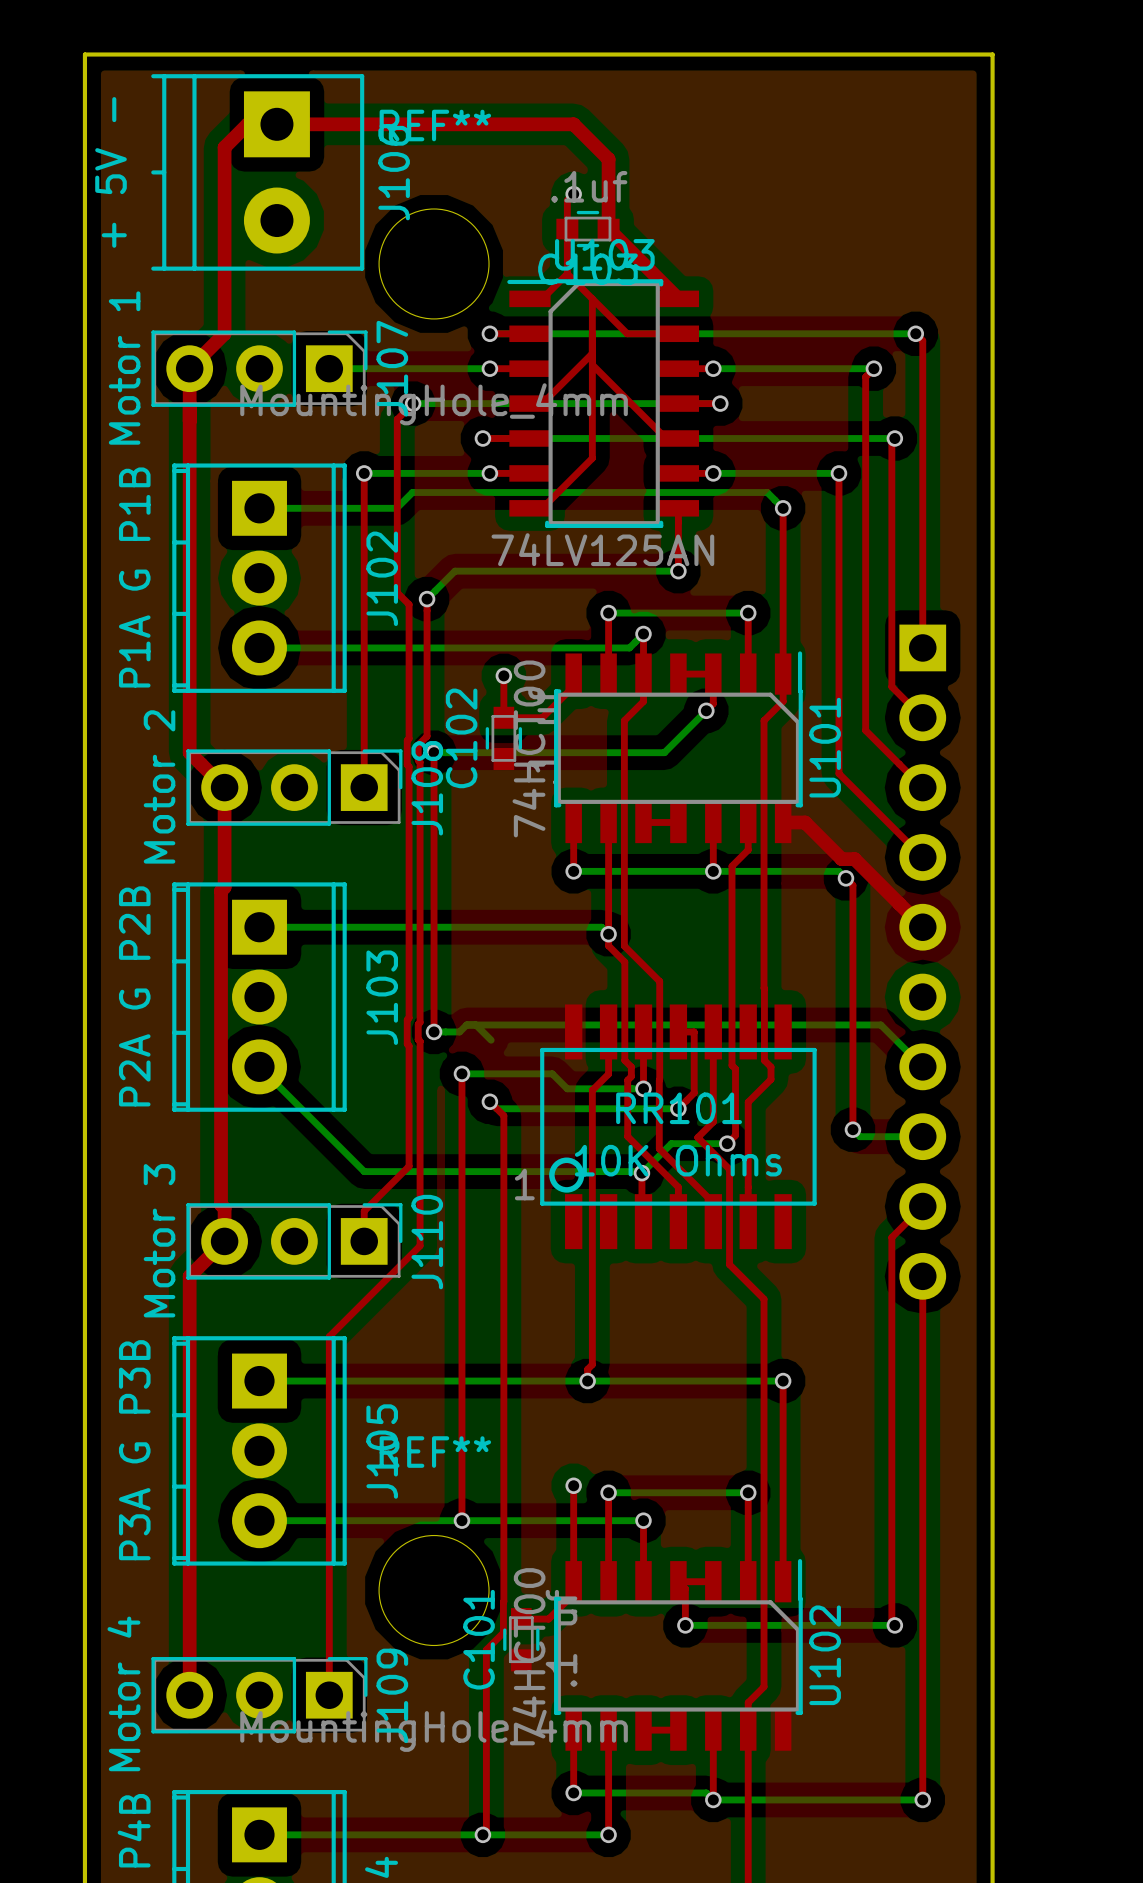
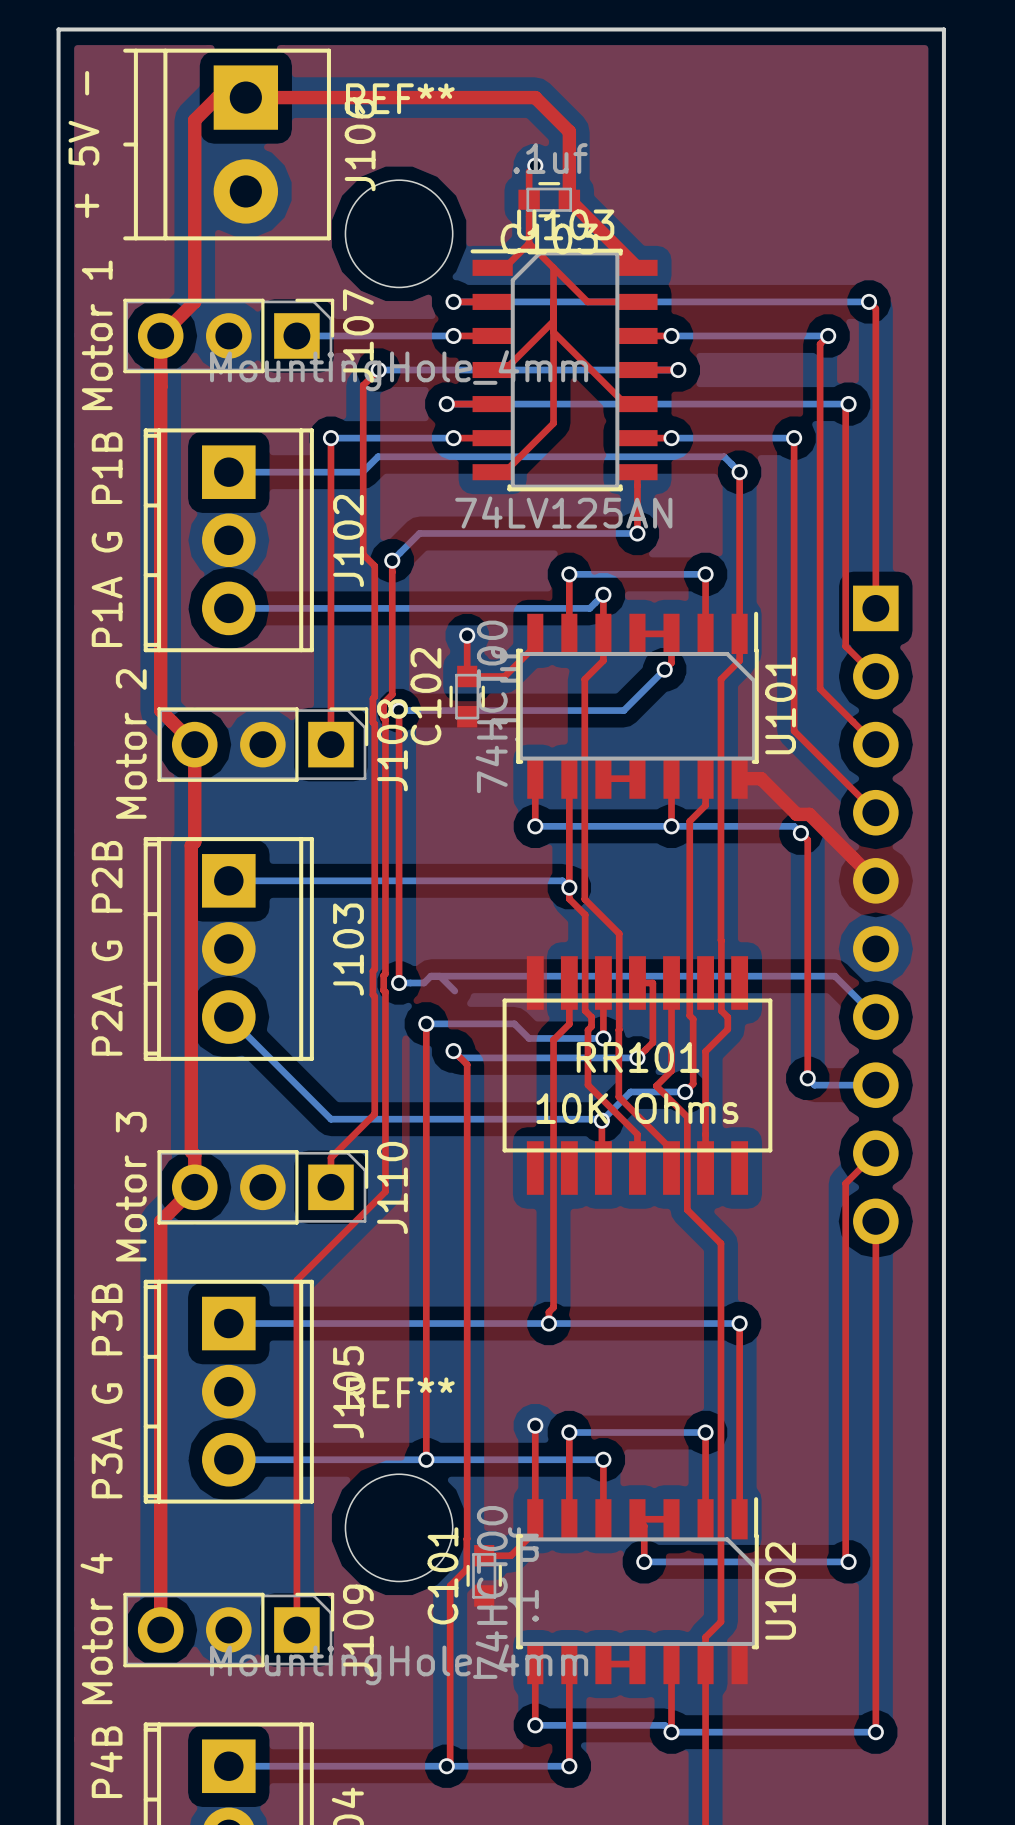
drawing: [549, 1157, 585, 1193] -> none
text: 1 (524, 1184) -> none

